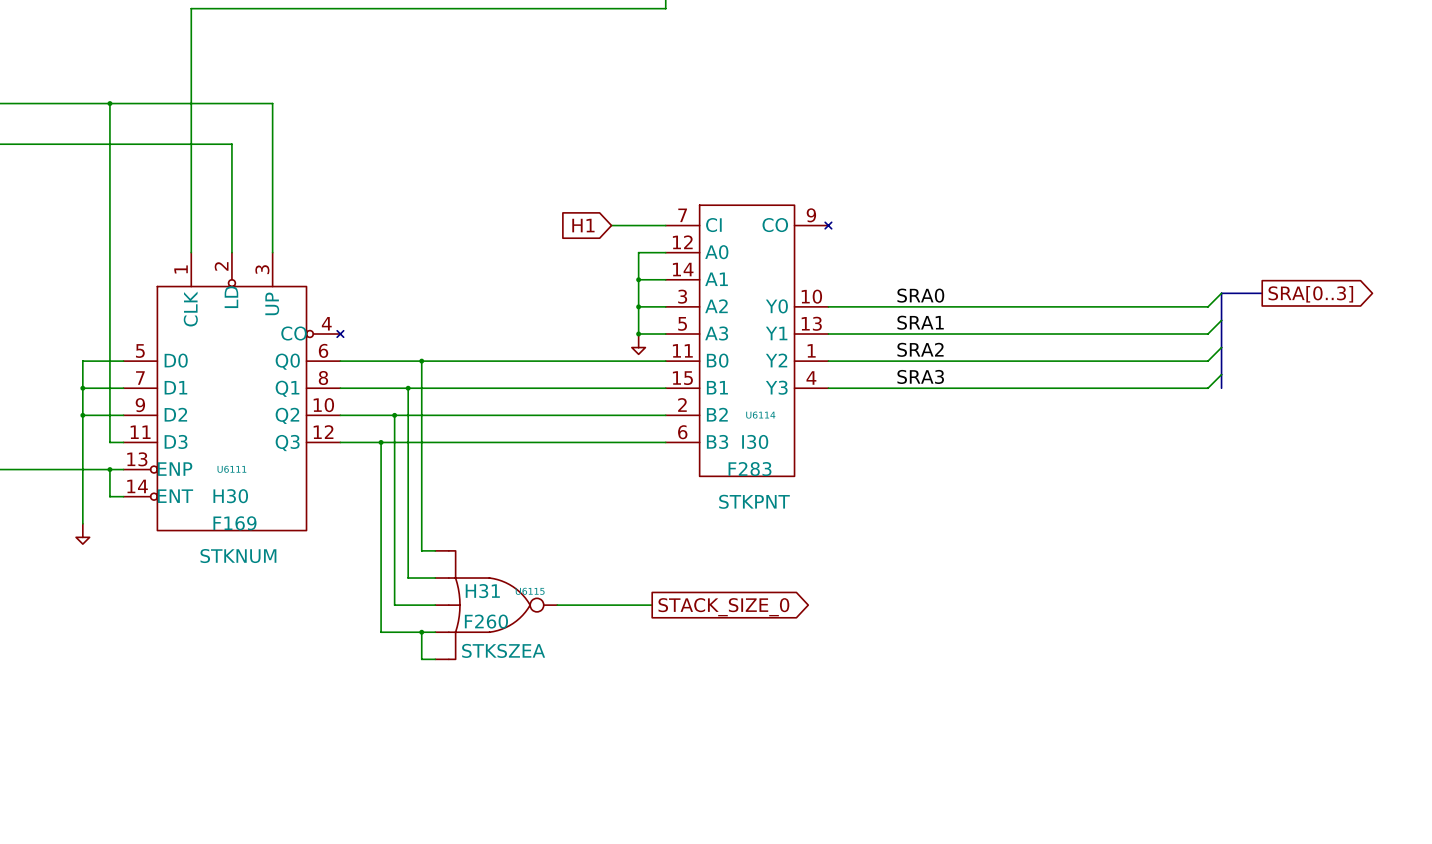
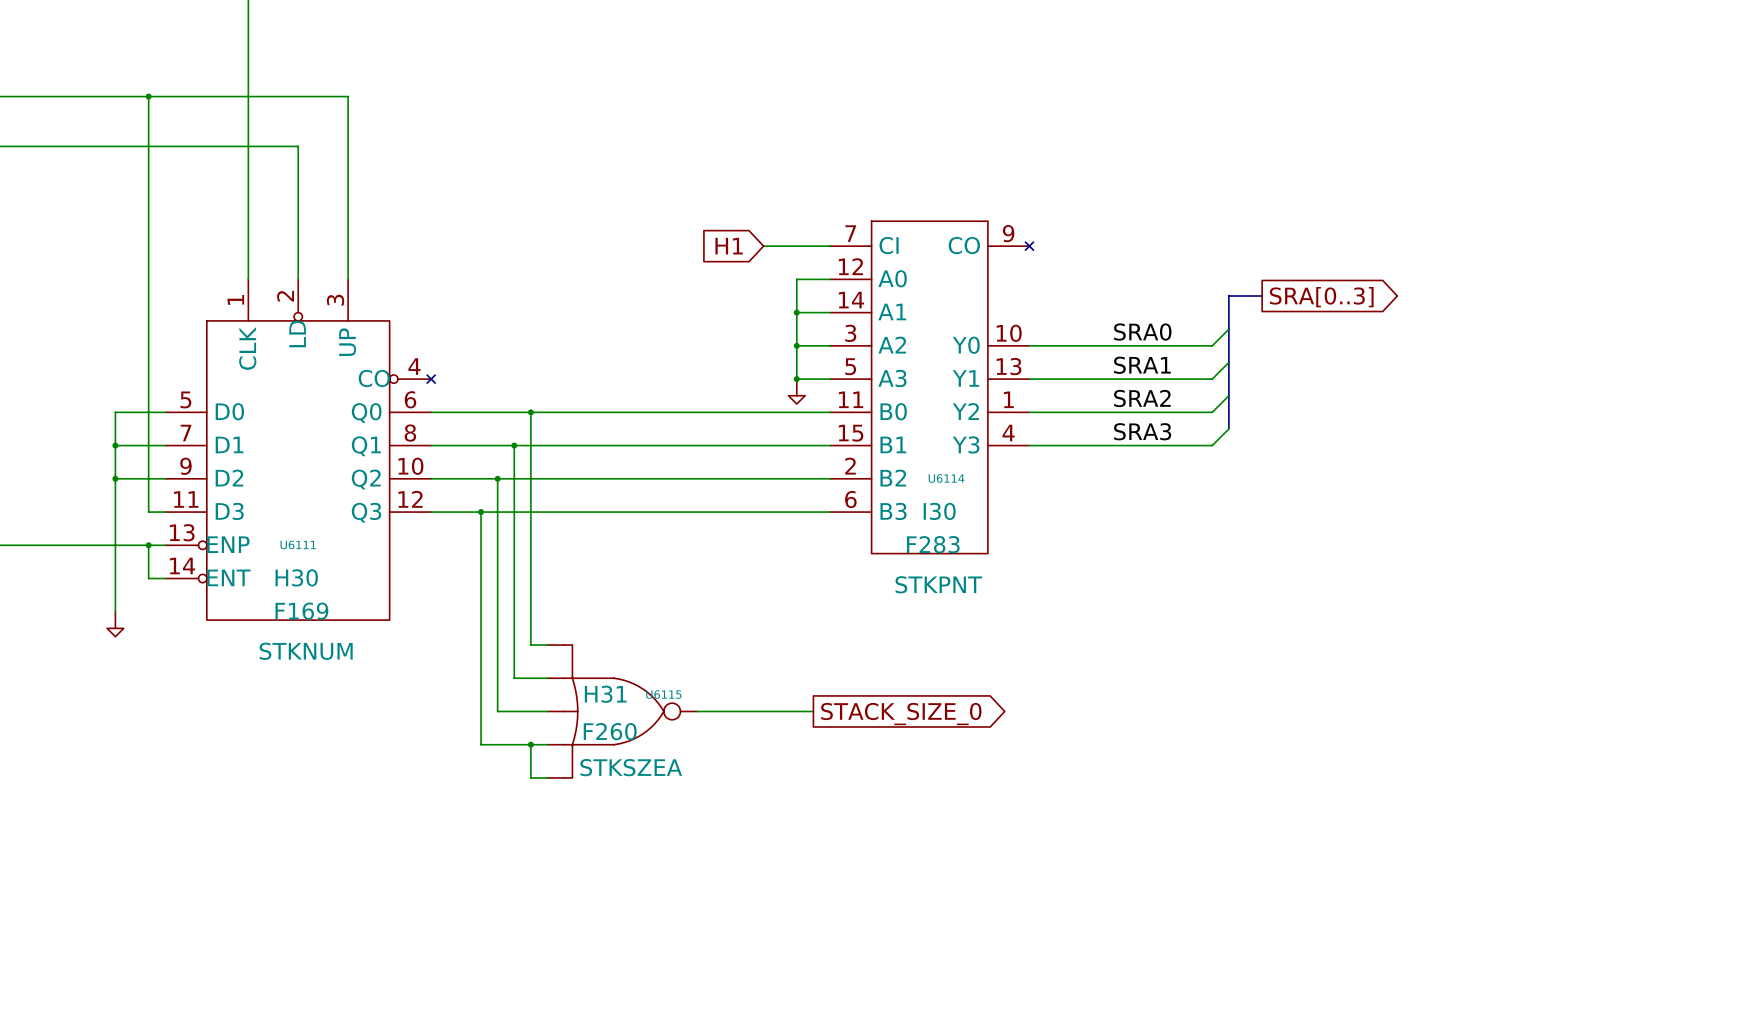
bus: none -> (1262, 296) (1228, 296) (1228, 428)
global label: none -> SRA[0..3] (1321, 297)
wire: (1221, 293) (1207, 306) (977, 306) -> (1228, 329) (1212, 345)
bus: (1262, 293) (1221, 293) (1221, 388) -> none
global label: SRA[0..3] (1310, 294) -> none
wire: (1221, 320) (1207, 334) (977, 334) -> (1228, 362) (1212, 379)
wire: (1221, 347) (1207, 361) (977, 361) -> (1228, 395) (1212, 412)
wire: (1221, 374) (1207, 388) (977, 388) -> (1228, 428) (1212, 445)

